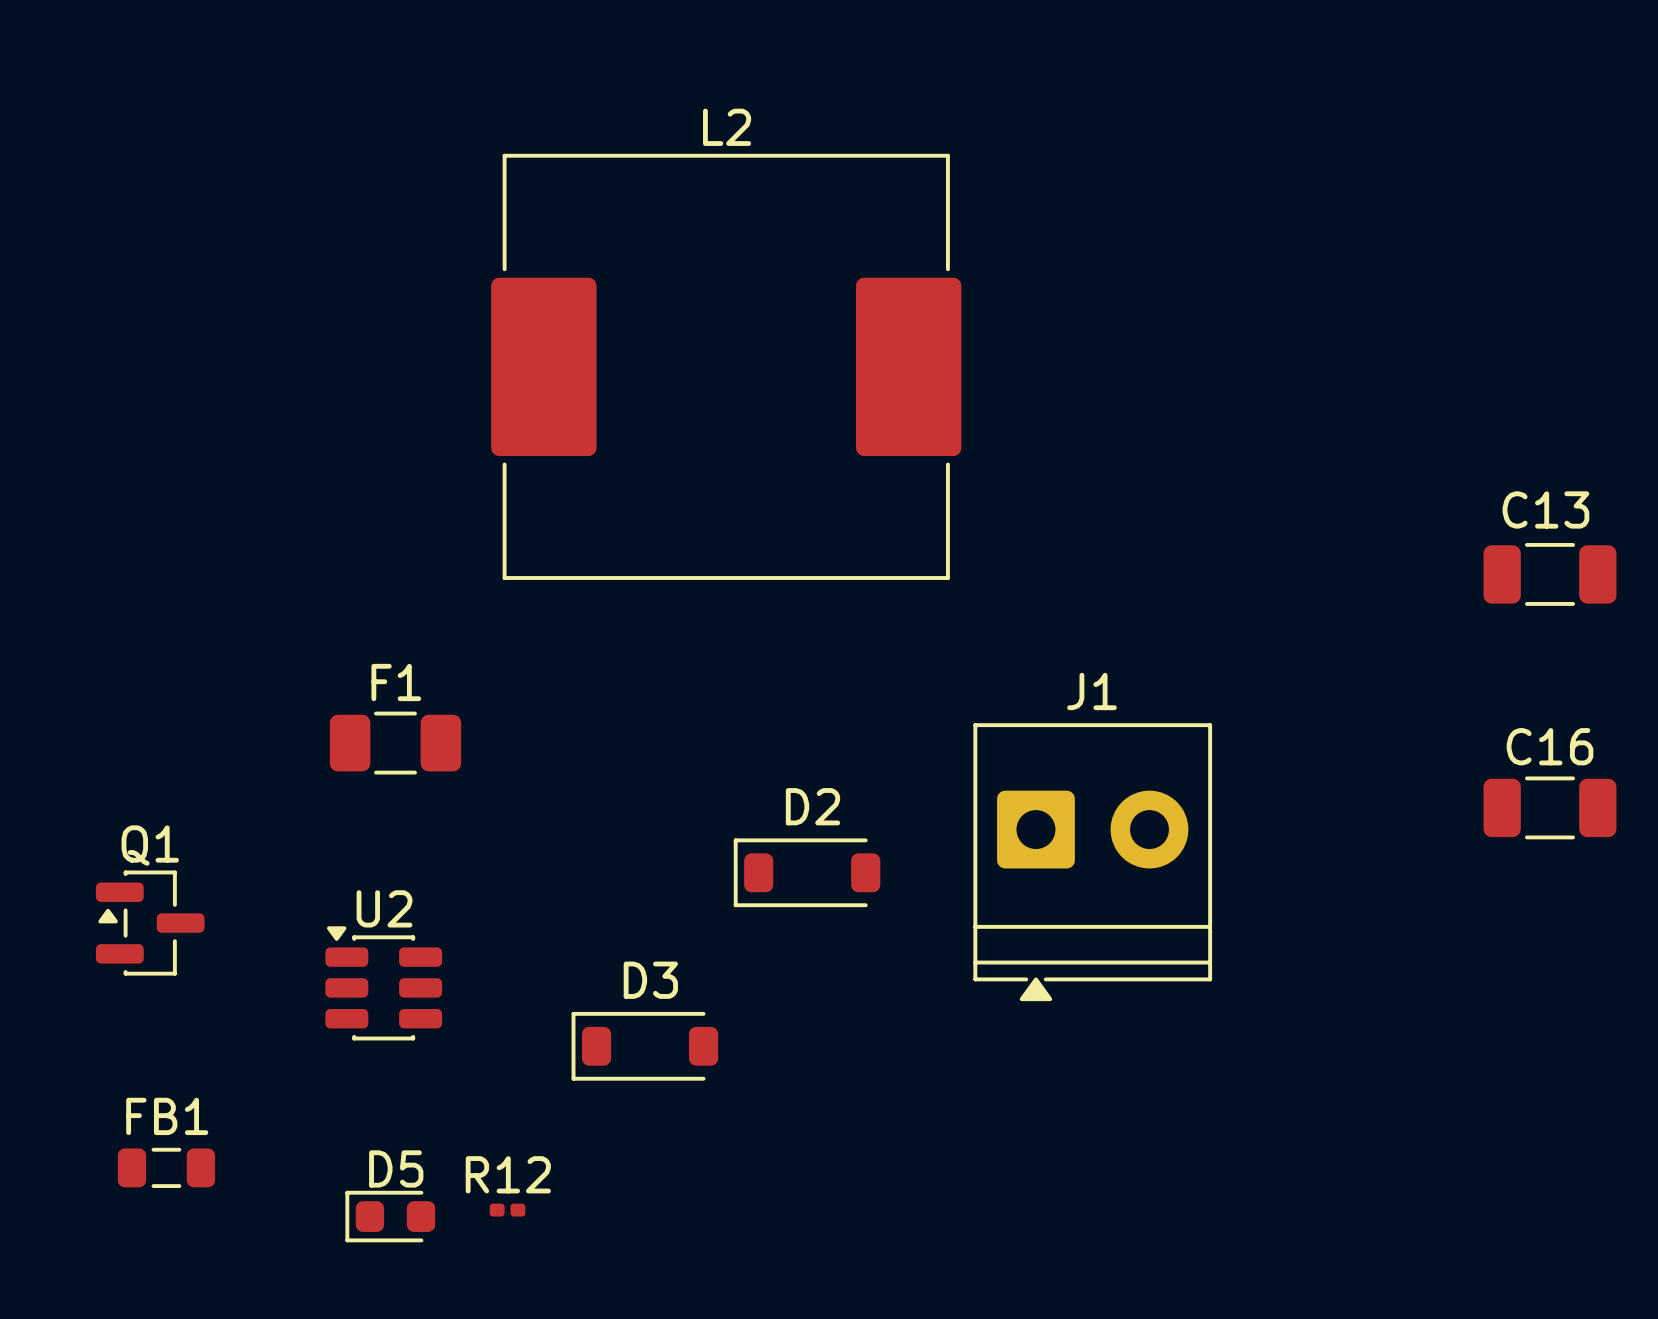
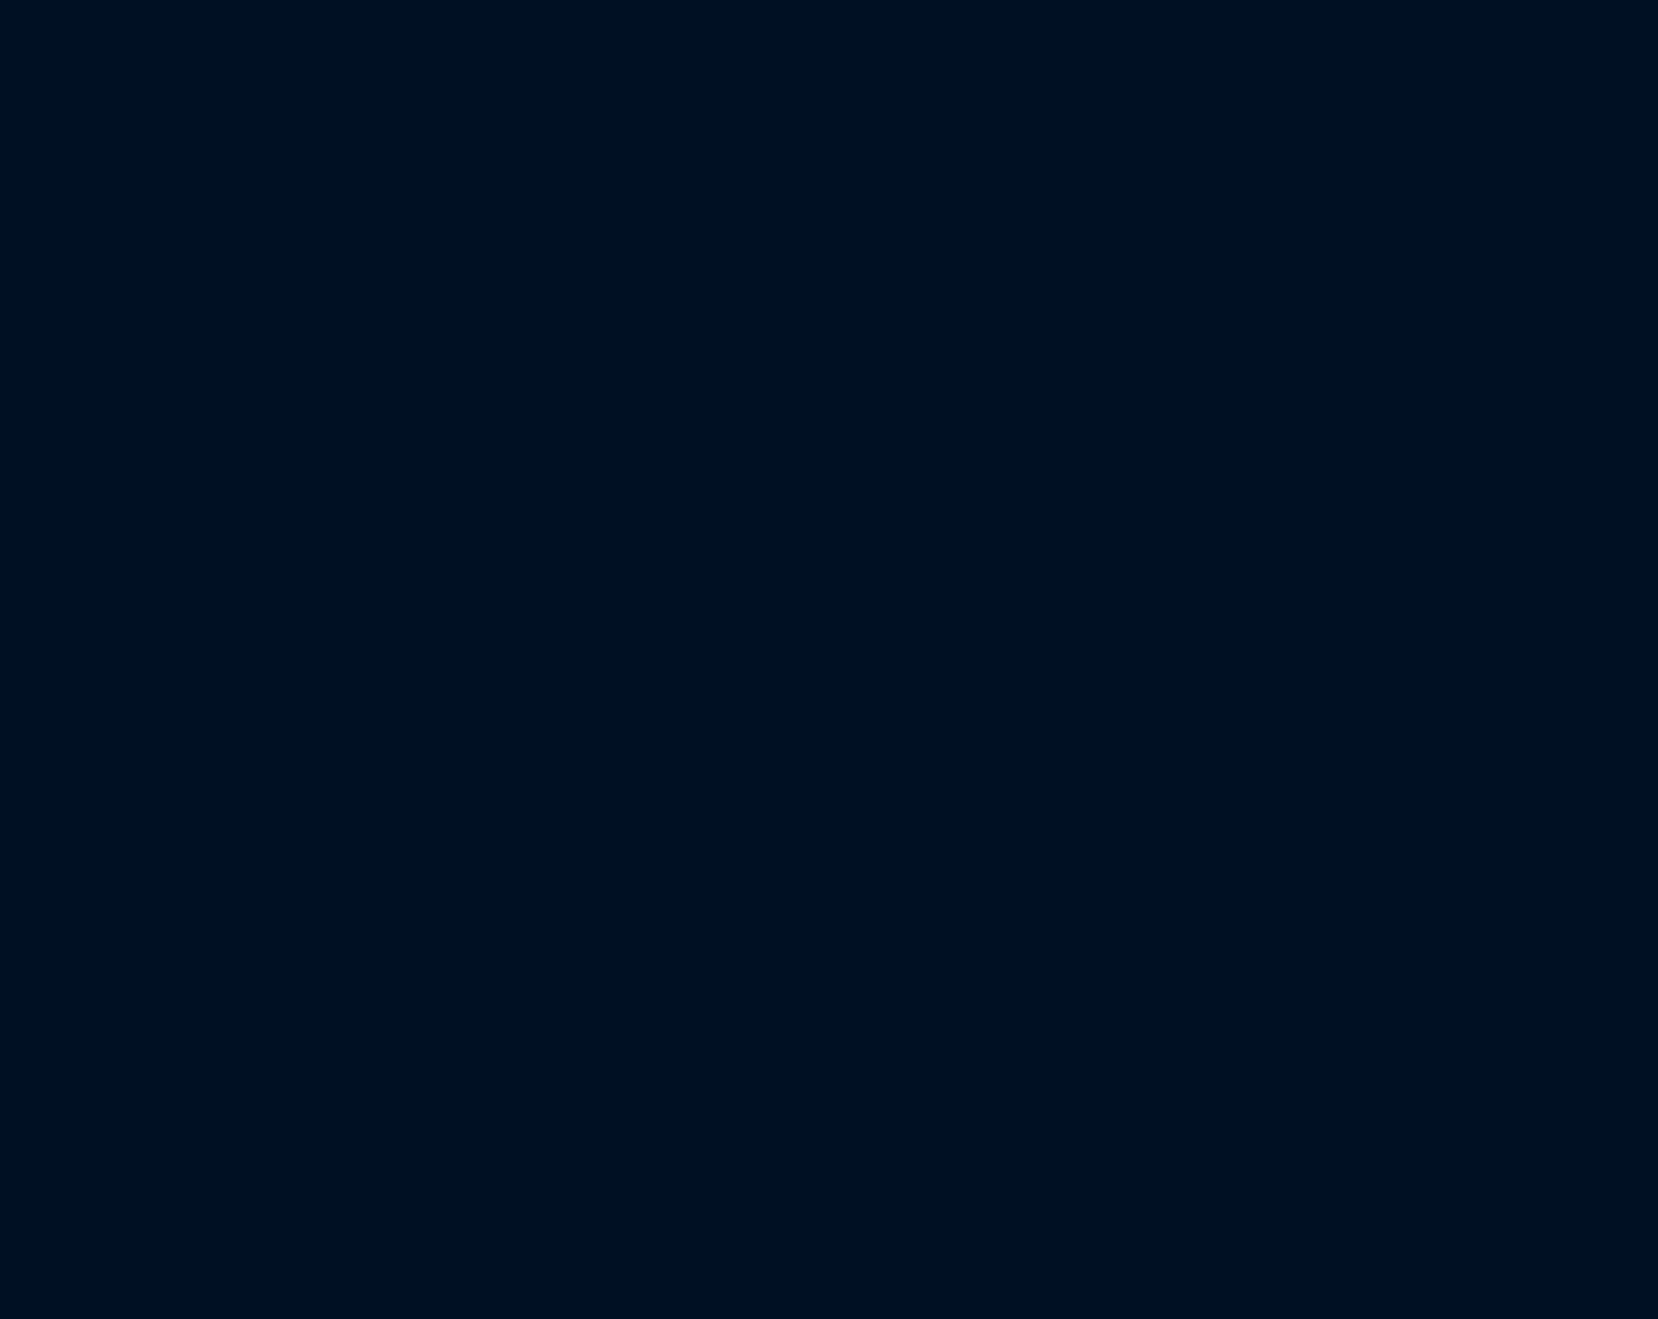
L2: (726, 366) -> none
C13: (1550, 574) -> none
F1: (395, 743) -> none
C16: (1550, 807) -> none
J1: (1092, 862) -> none
D2: (807, 872) -> none
Q1: (150, 923) -> none
U2: (383, 983) -> none
D3: (644, 1046) -> none
FB1: (166, 1167) -> none
R12: (507, 1210) -> none
D5: (390, 1216) -> none

